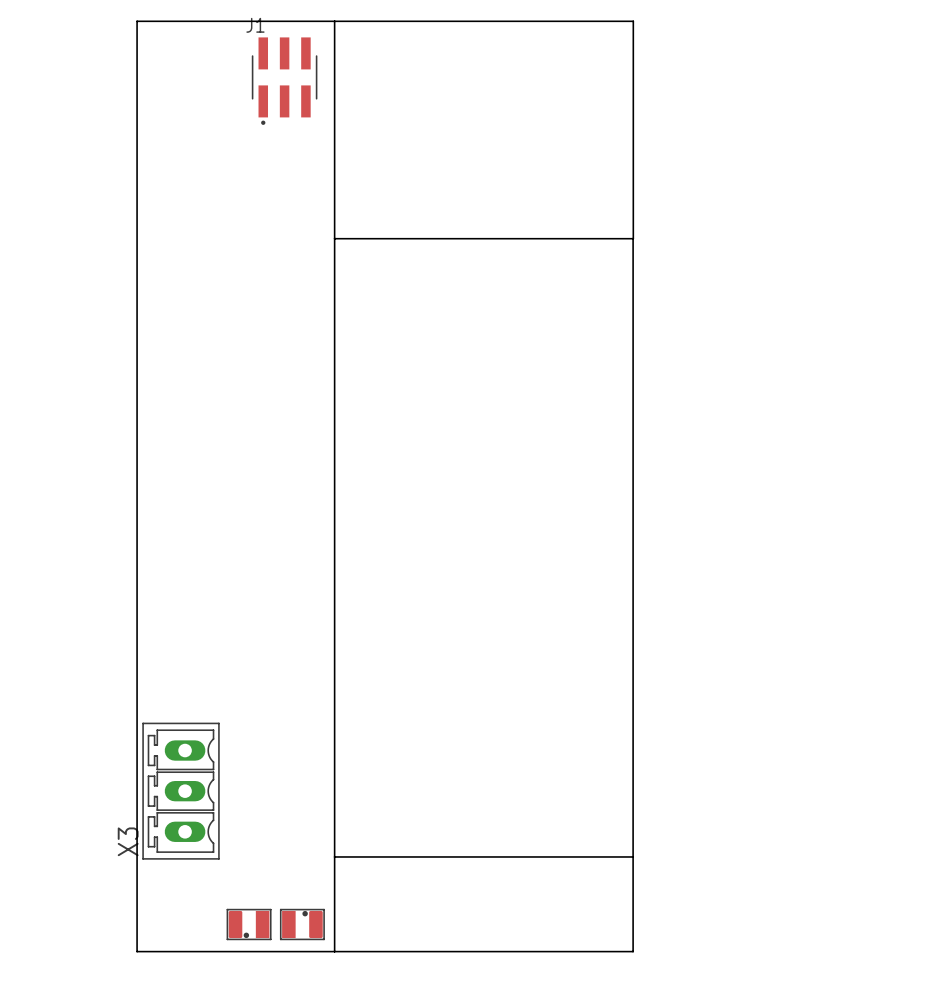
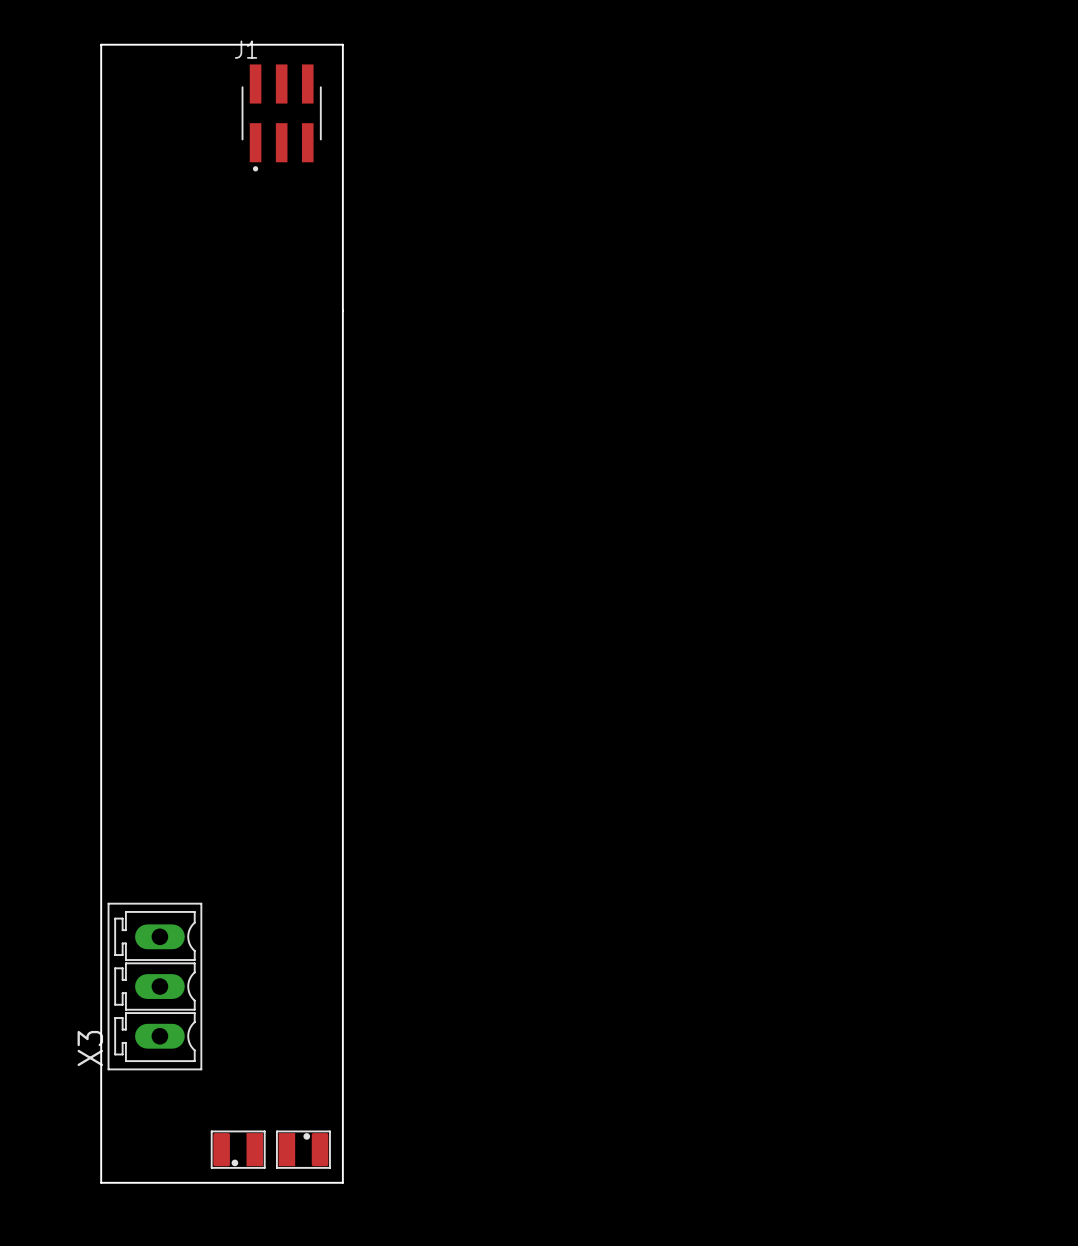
board edge: (334, 21) (633, 21) (633, 238) (334, 238) -> none
board edge: (633, 239) (633, 856) -> none
board edge: (334, 856) (633, 856) (633, 951) (334, 951) -> none

